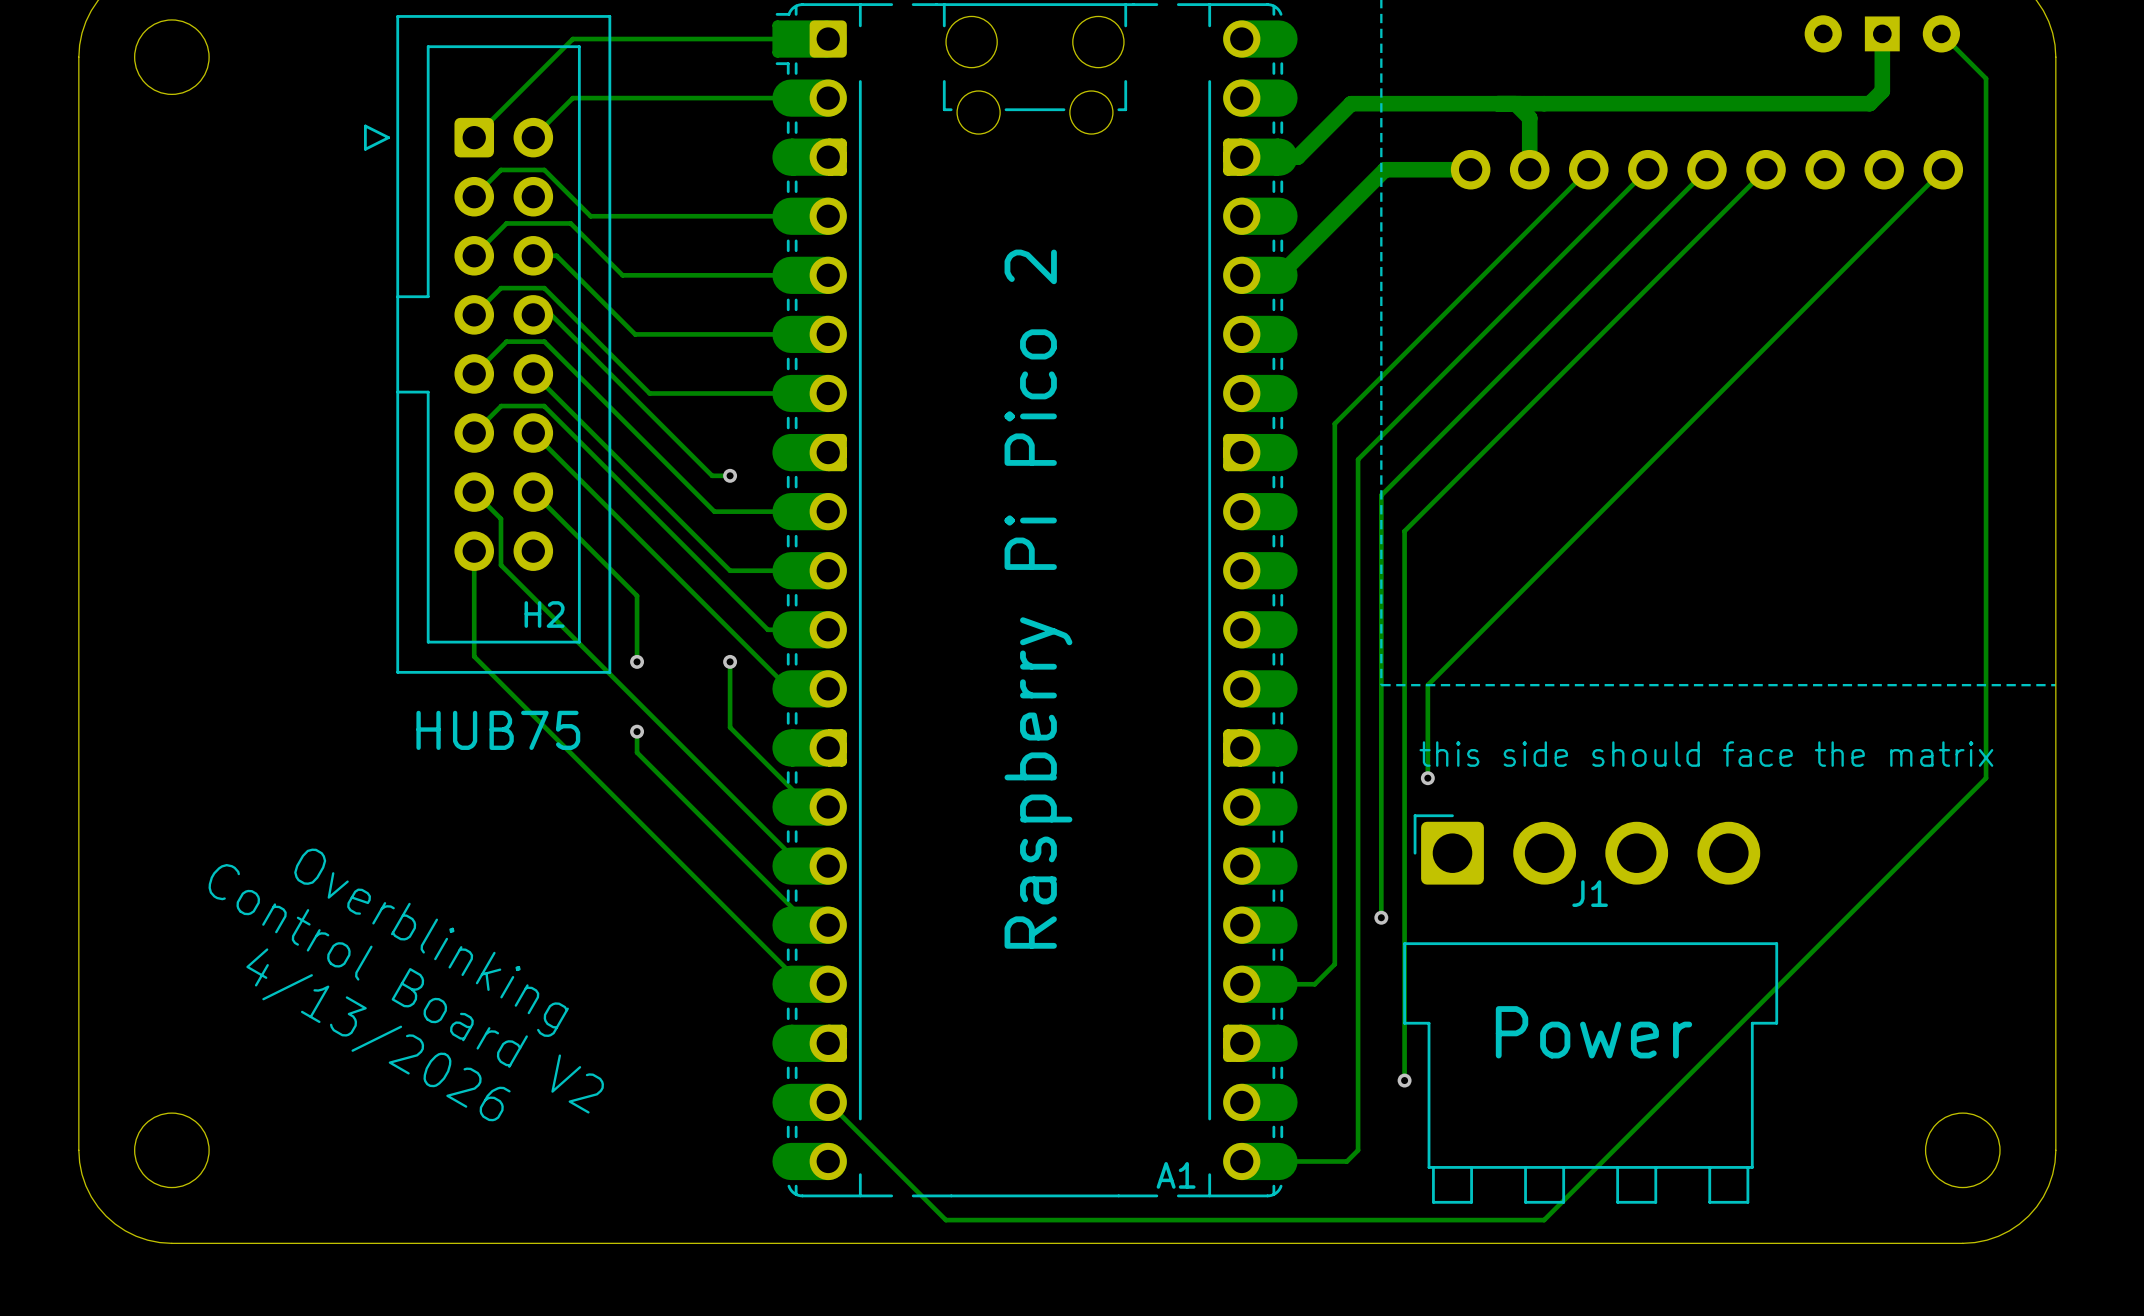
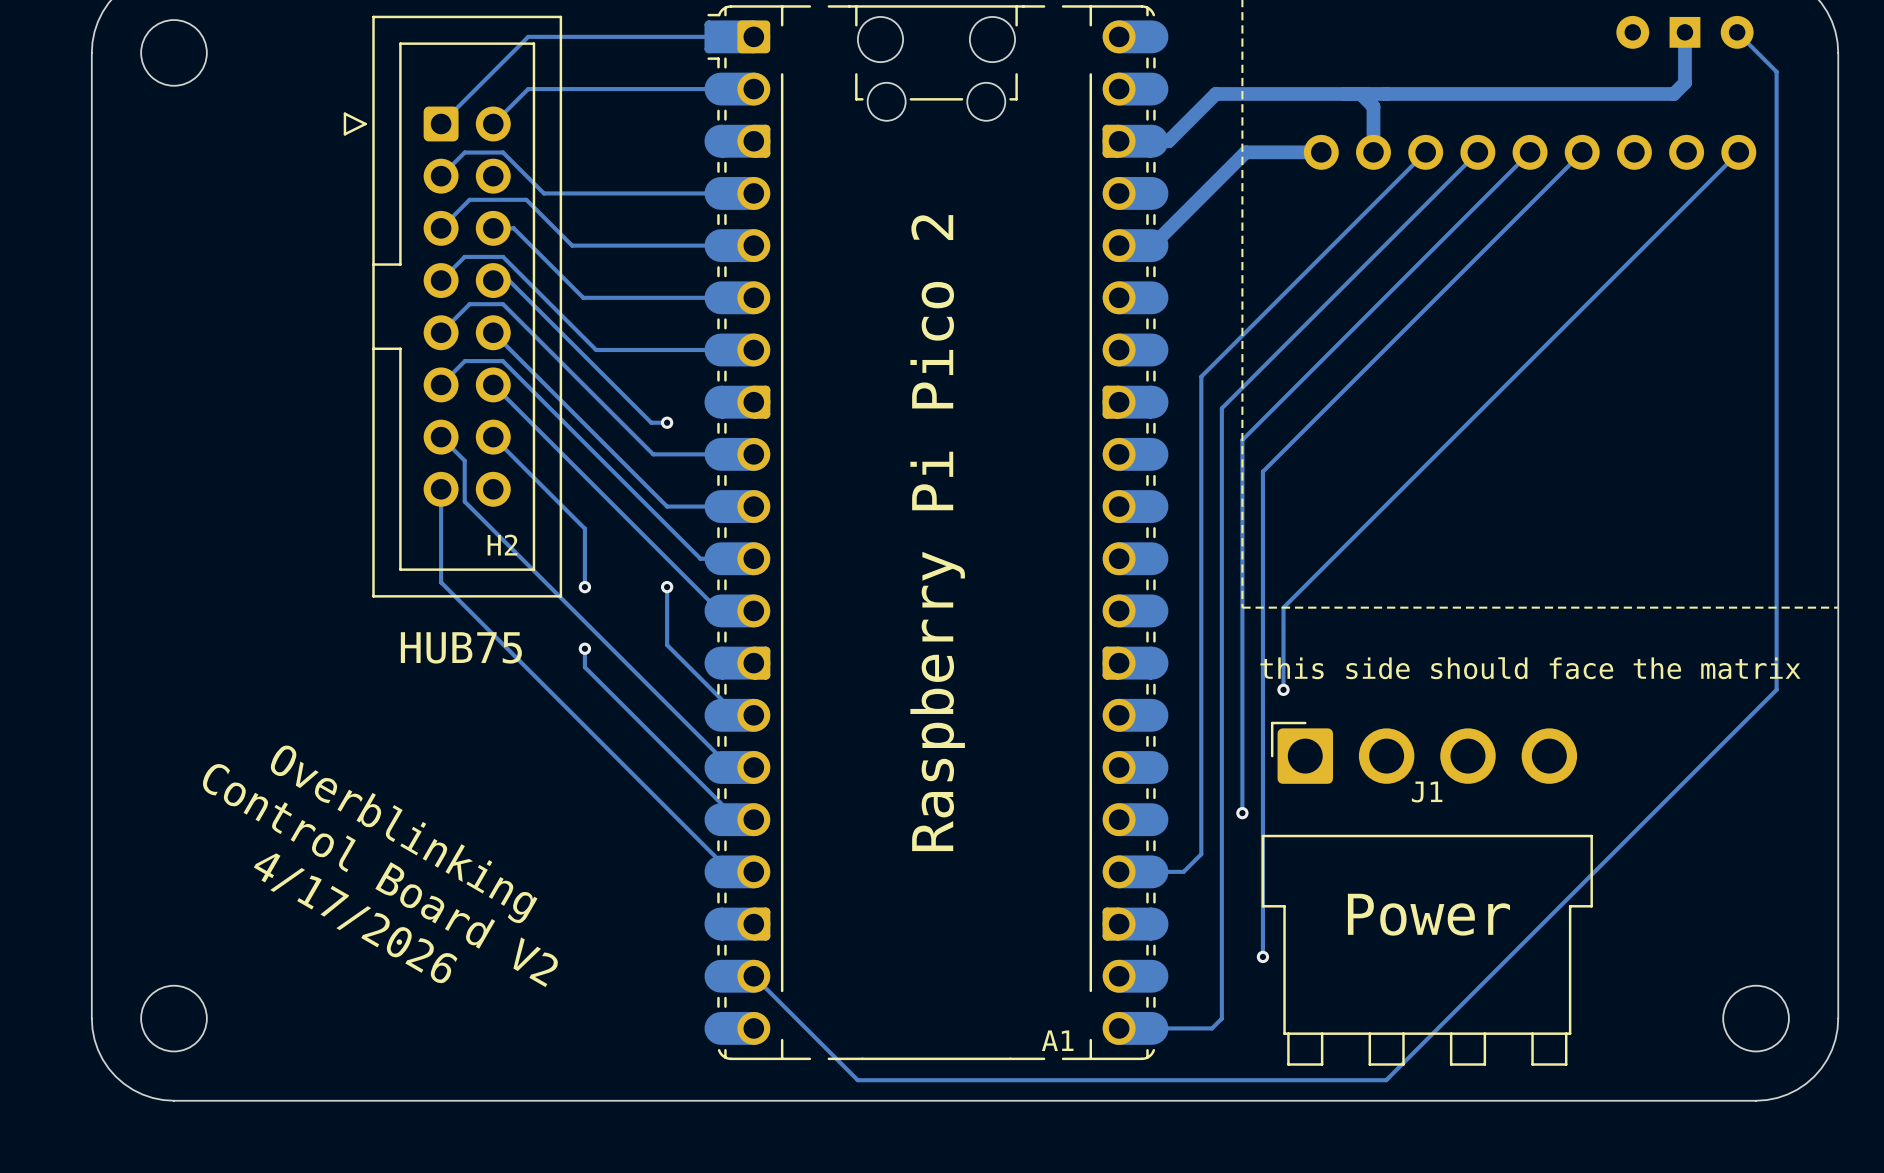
text: 4/13/2026 (378, 1034) -> 4/17/2026 (355, 918)

